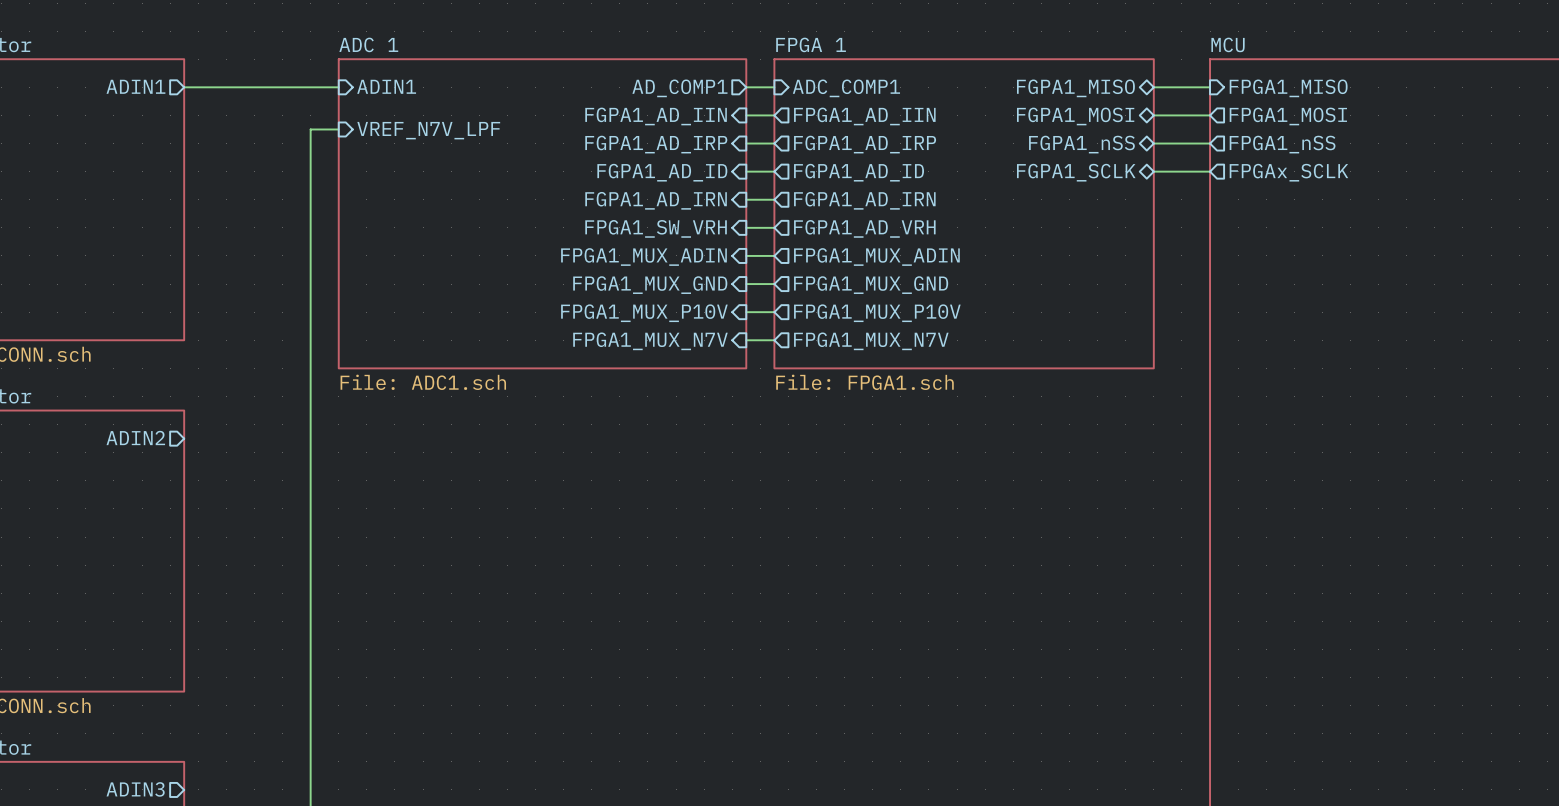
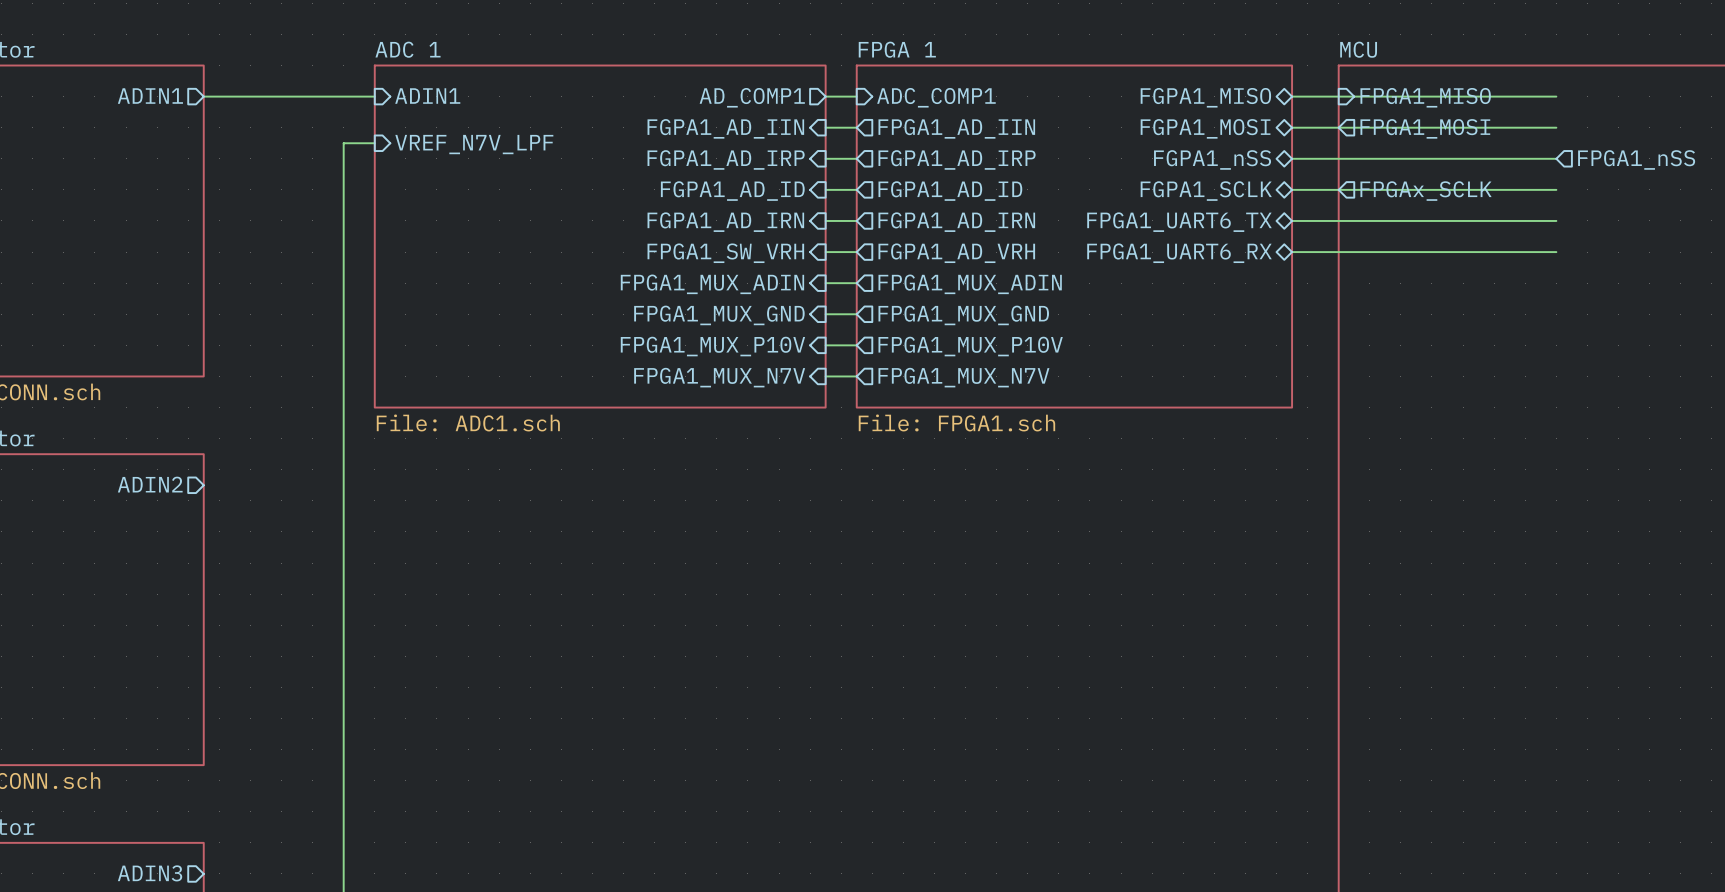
sheet FPGA 1 shape: [774, 59, 1154, 369] -> [856, 65, 1293, 408]
wire: (1153, 87) (1167, 87) -> none
wire: none -> (1338, 96) (1556, 96)
sheet pin position: FGPA1_MISO (1075, 88) -> FGPA1_MISO (1205, 97)
wire: (1153, 115) (1167, 115) -> none
wire: none -> (1338, 127) (1556, 127)
sheet pin position: FGPA1_MOSI (1075, 116) -> FGPA1_MOSI (1205, 128)
wire: (1153, 143) (1167, 143) -> none
wire: none -> (1338, 158) (1556, 158)
sheet pin position: FGPA1_nSS (1081, 144) -> FGPA1_nSS (1212, 159)
sheet pin position: FPGA1_nSS (1282, 144) -> FPGA1_nSS (1636, 159)
wire: (1153, 171) (1167, 171) -> none
wire: none -> (1338, 189) (1556, 189)
sheet pin position: FGPA1_SCLK (1076, 172) -> FGPA1_SCLK (1206, 191)
wire: none -> (1292, 220) (1556, 220)
sheet pin: none -> FPGA1_UART6_TX (1179, 222)
wire: none -> (1292, 252) (1556, 252)
sheet pin: none -> FPGA1_UART6_RX (1179, 253)

